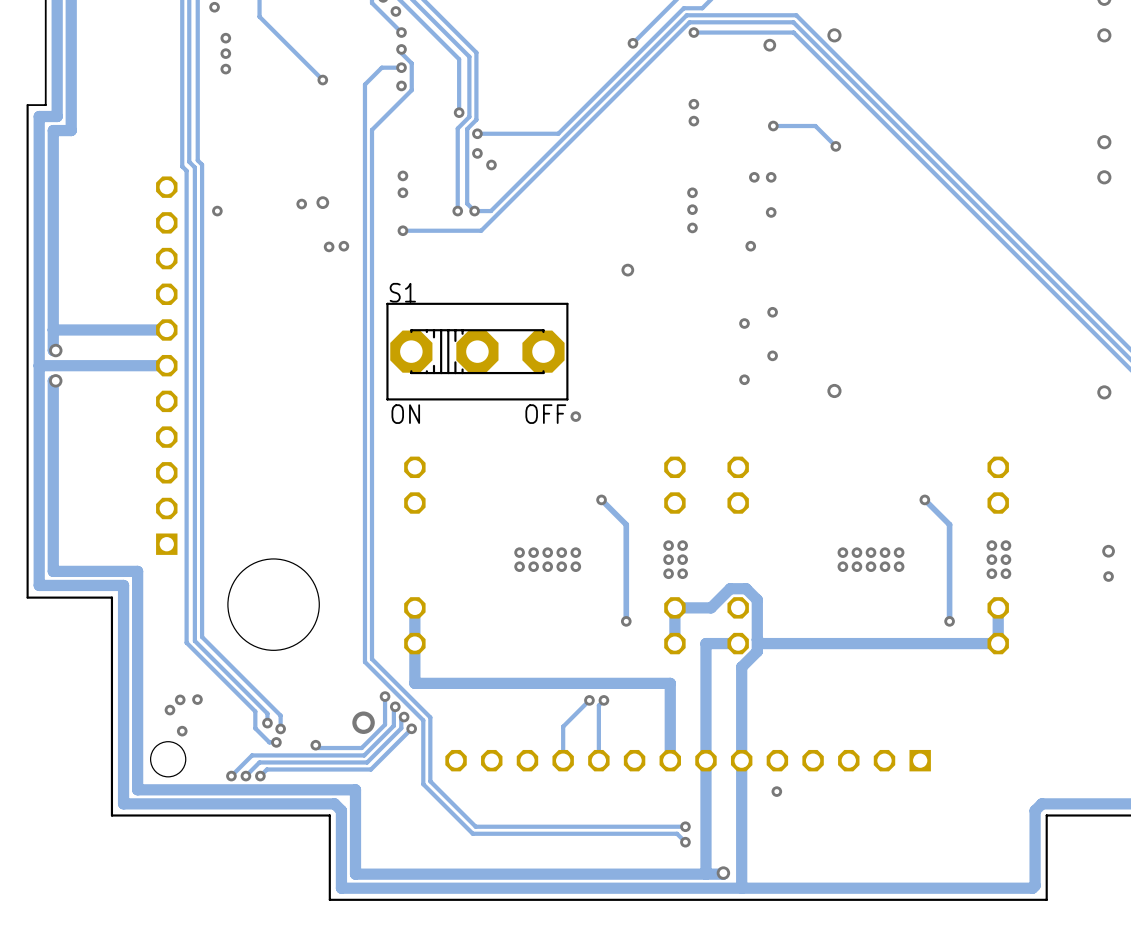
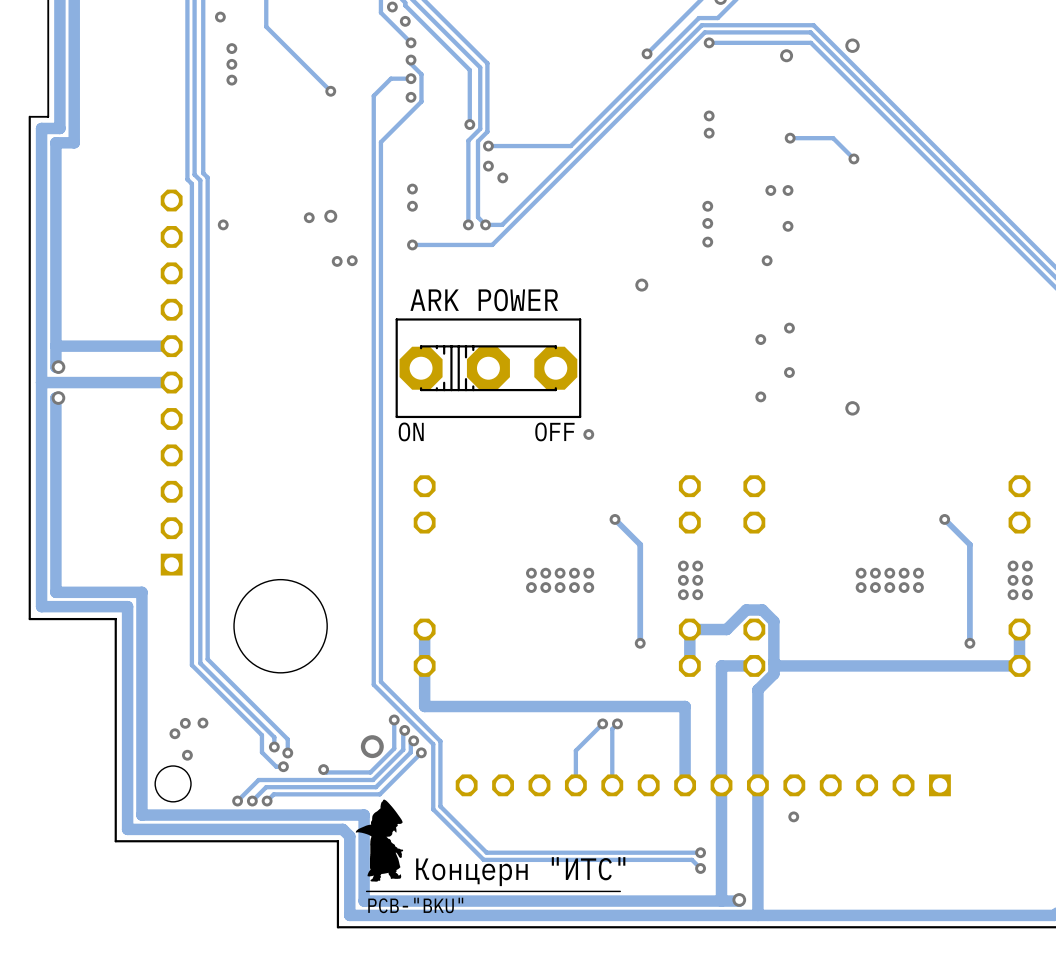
text: none -> ARK POWER (484, 300)
S1 name: S1 (402, 292) -> none
drawing: none -> [355, 799, 622, 893]

